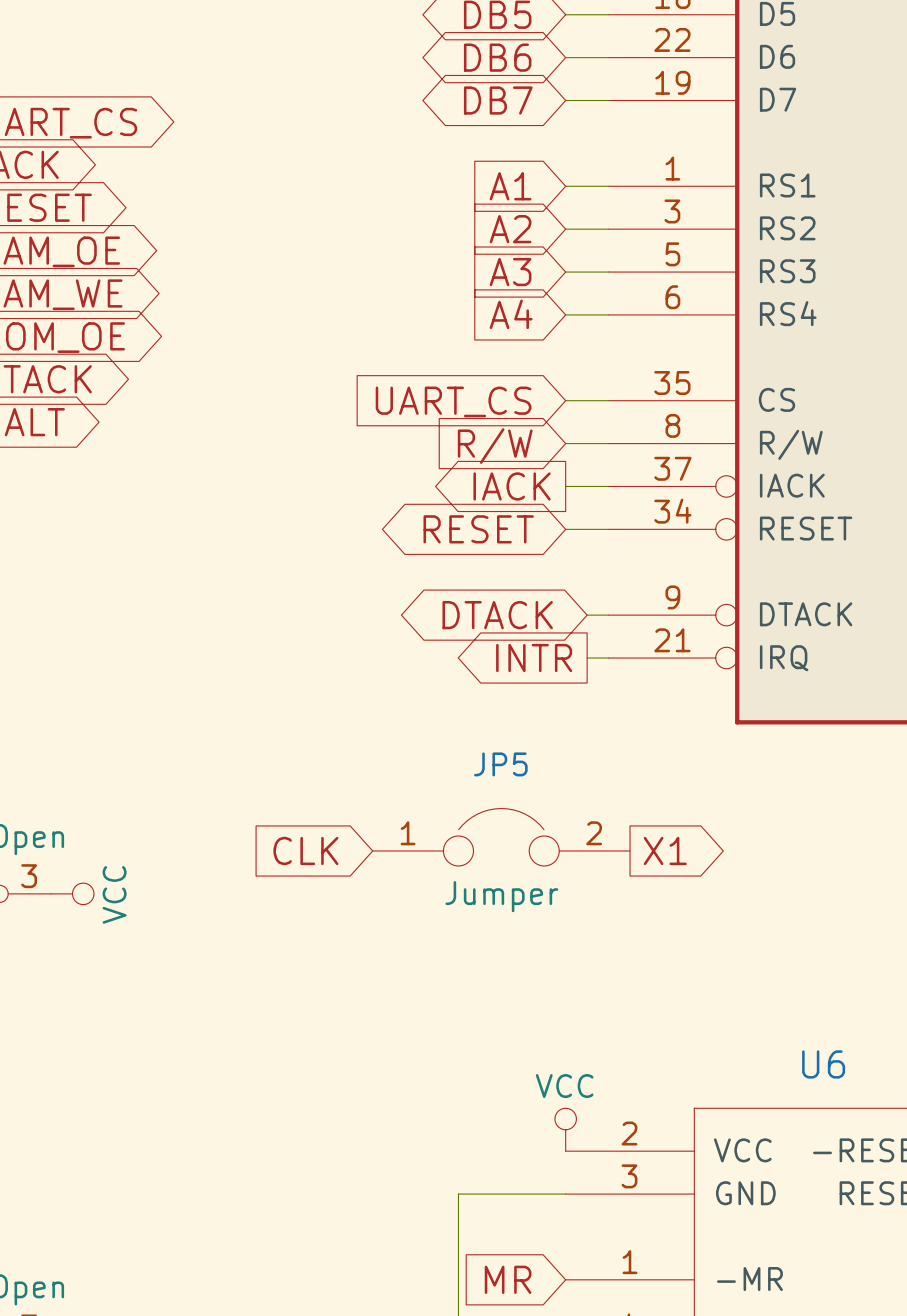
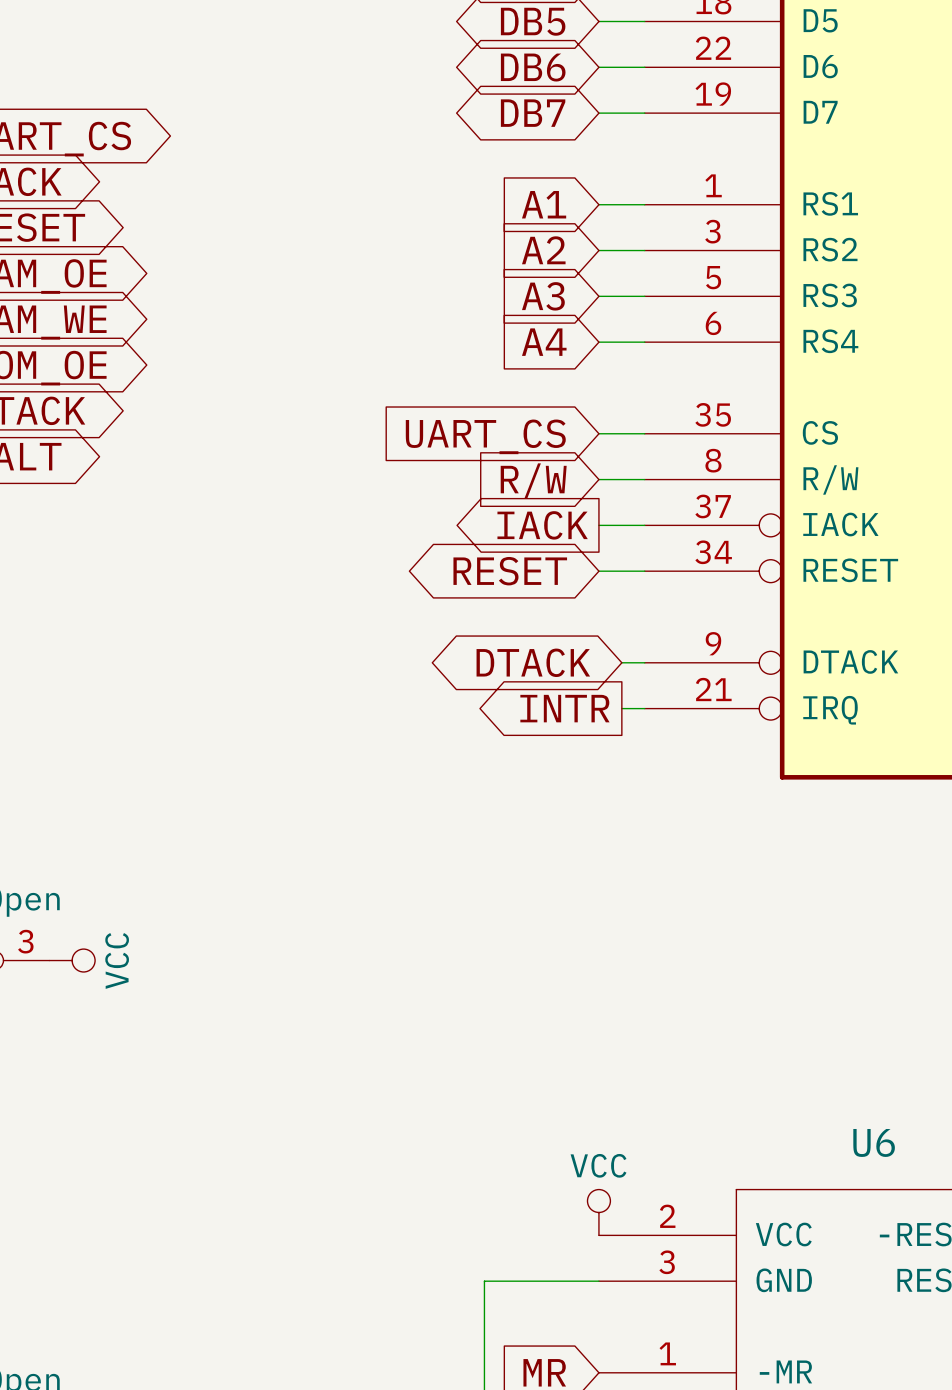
JP5: Jumper (501, 837) -> none
global label: CLK (305, 850) -> none
global label: X1 (665, 850) -> none

